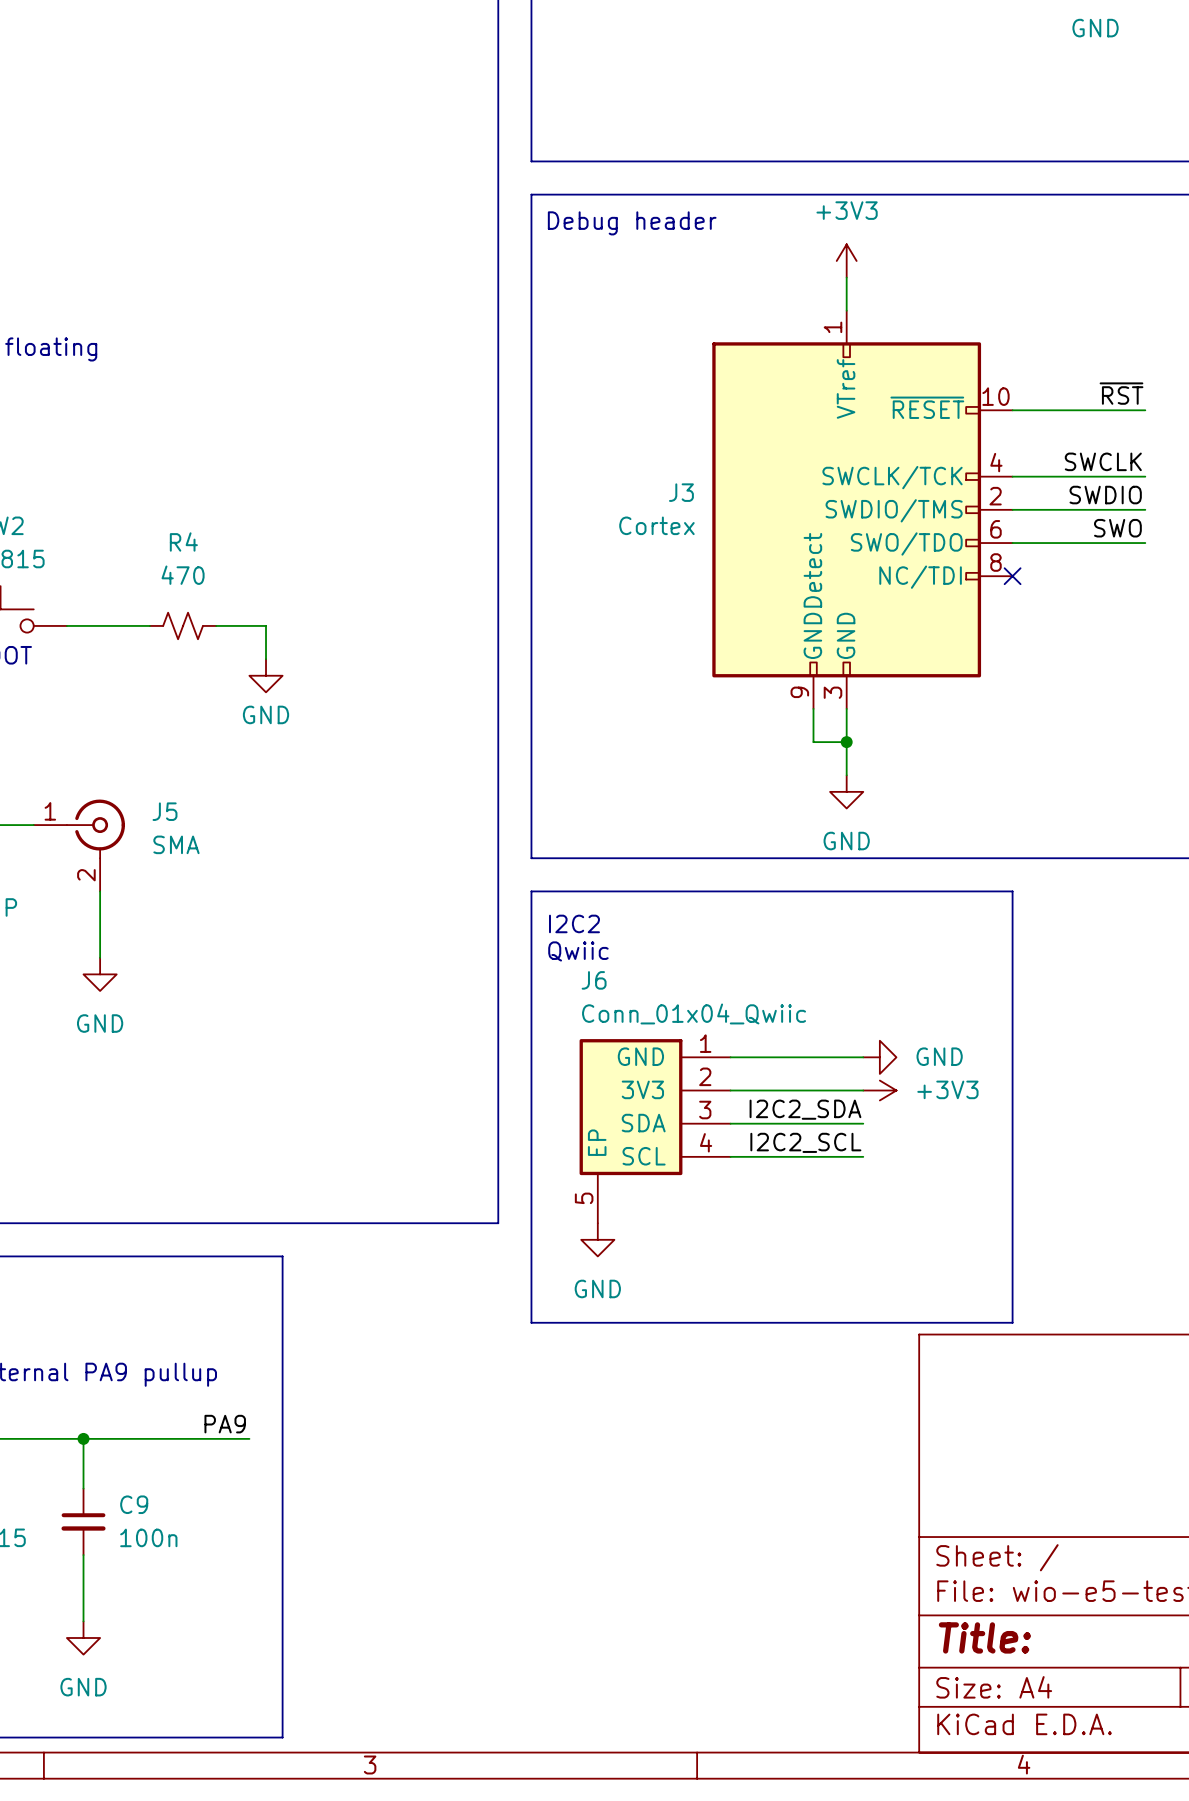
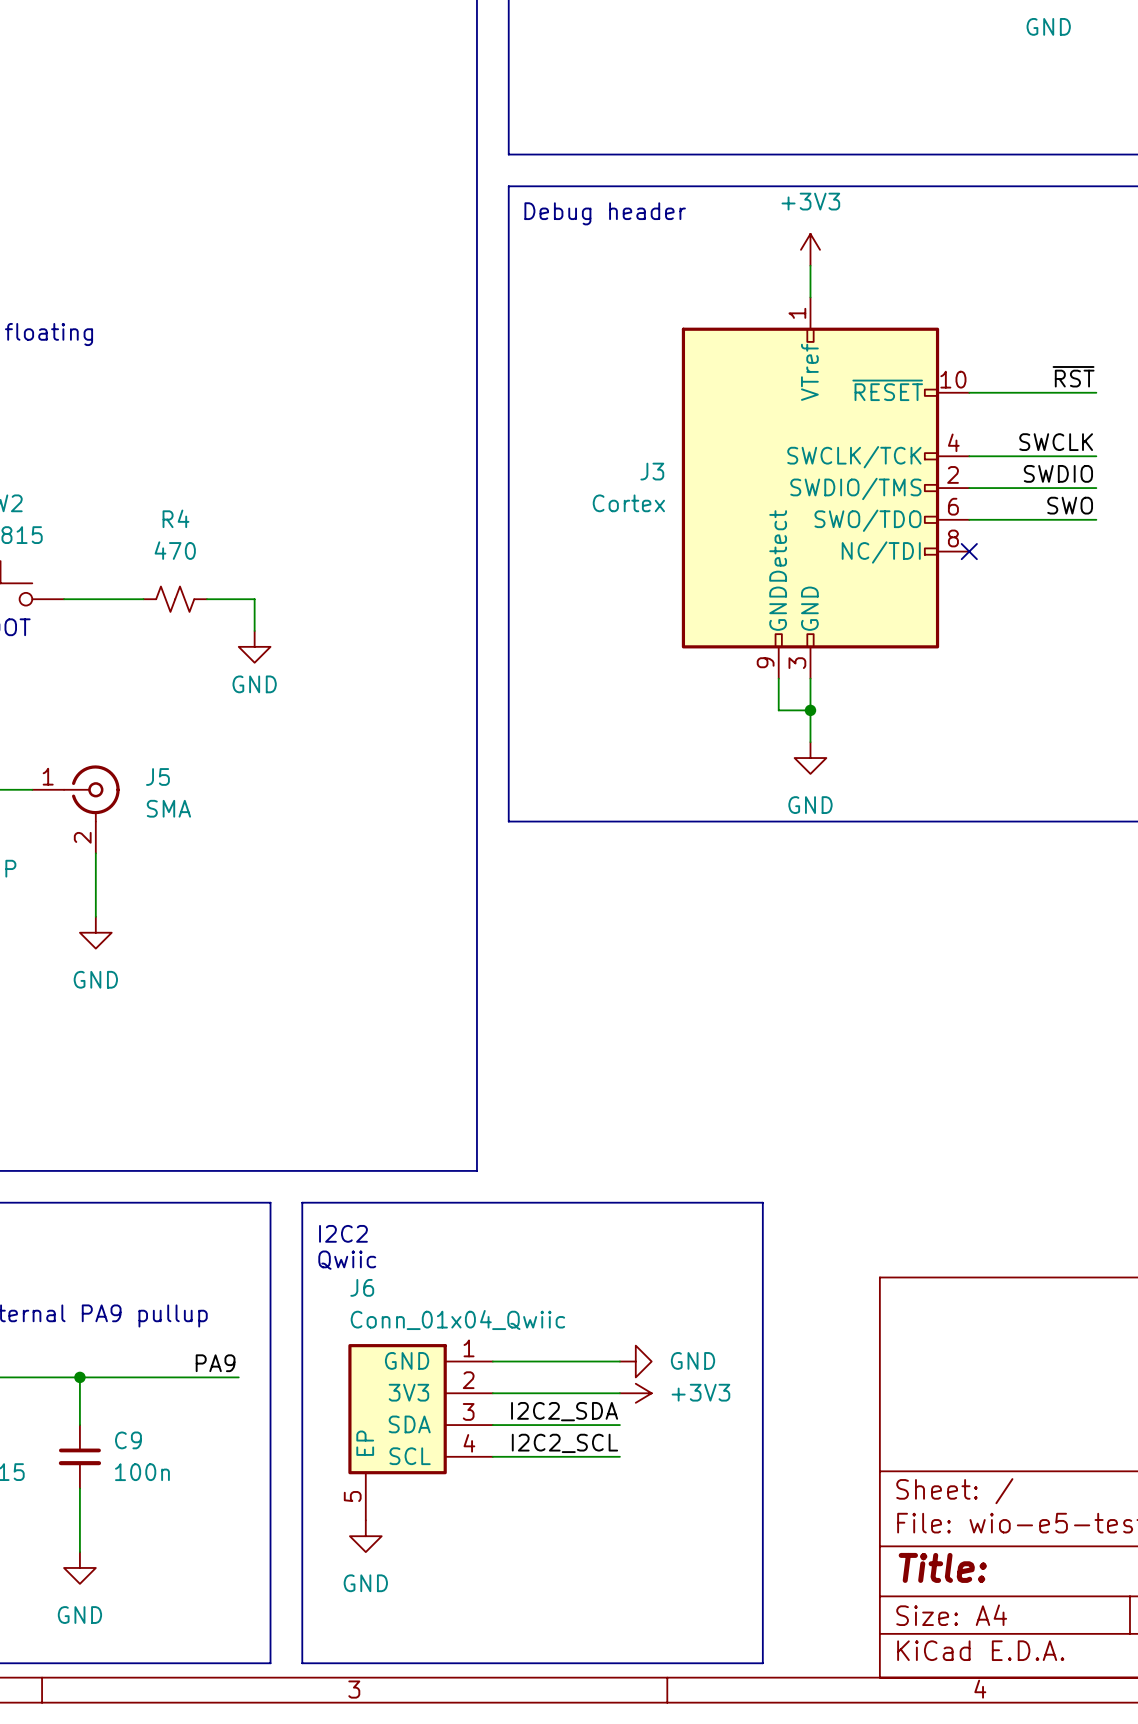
line: (531, 891) (1012, 891) (1012, 1322) (531, 1322) (531, 891) -> none
text: I2C2 (574, 923) -> none
text: Qwiic (578, 951) -> none
wire: (730, 1057) (863, 1057) -> none
power symbol: GND (879, 1057) -> none
wire: (730, 1090) (863, 1090) -> none
power symbol: +3V3 (879, 1090) -> none
label: I2C2_SDA (805, 1109) -> none
wire: (730, 1123) (863, 1123) -> none
J6 position: (655, 1131) -> (420, 1432)
label: I2C2_SCL (805, 1142) -> none
wire: (730, 1156) (863, 1156) -> none
power symbol rotation: 0° (597, 1239) -> 90° counterclockwise (635, 1361)
power symbol position: GND (597, 1239) -> GND (635, 1361)
line: none -> (302, 1202) (762, 1202) (762, 1663) (302, 1663) (302, 1202)
text: none -> I2C2 (343, 1233)
text: none -> Qwiic (347, 1260)
wire: none -> (492, 1361) (619, 1361)
wire: none -> (492, 1393) (619, 1393)
power symbol: none -> +3V3 (635, 1393)
label: none -> I2C2_SDA (564, 1411)
wire: none -> (492, 1425) (619, 1425)
label: none -> I2C2_SCL (564, 1443)
wire: none -> (492, 1456) (619, 1456)
power symbol: none -> GND (365, 1536)

